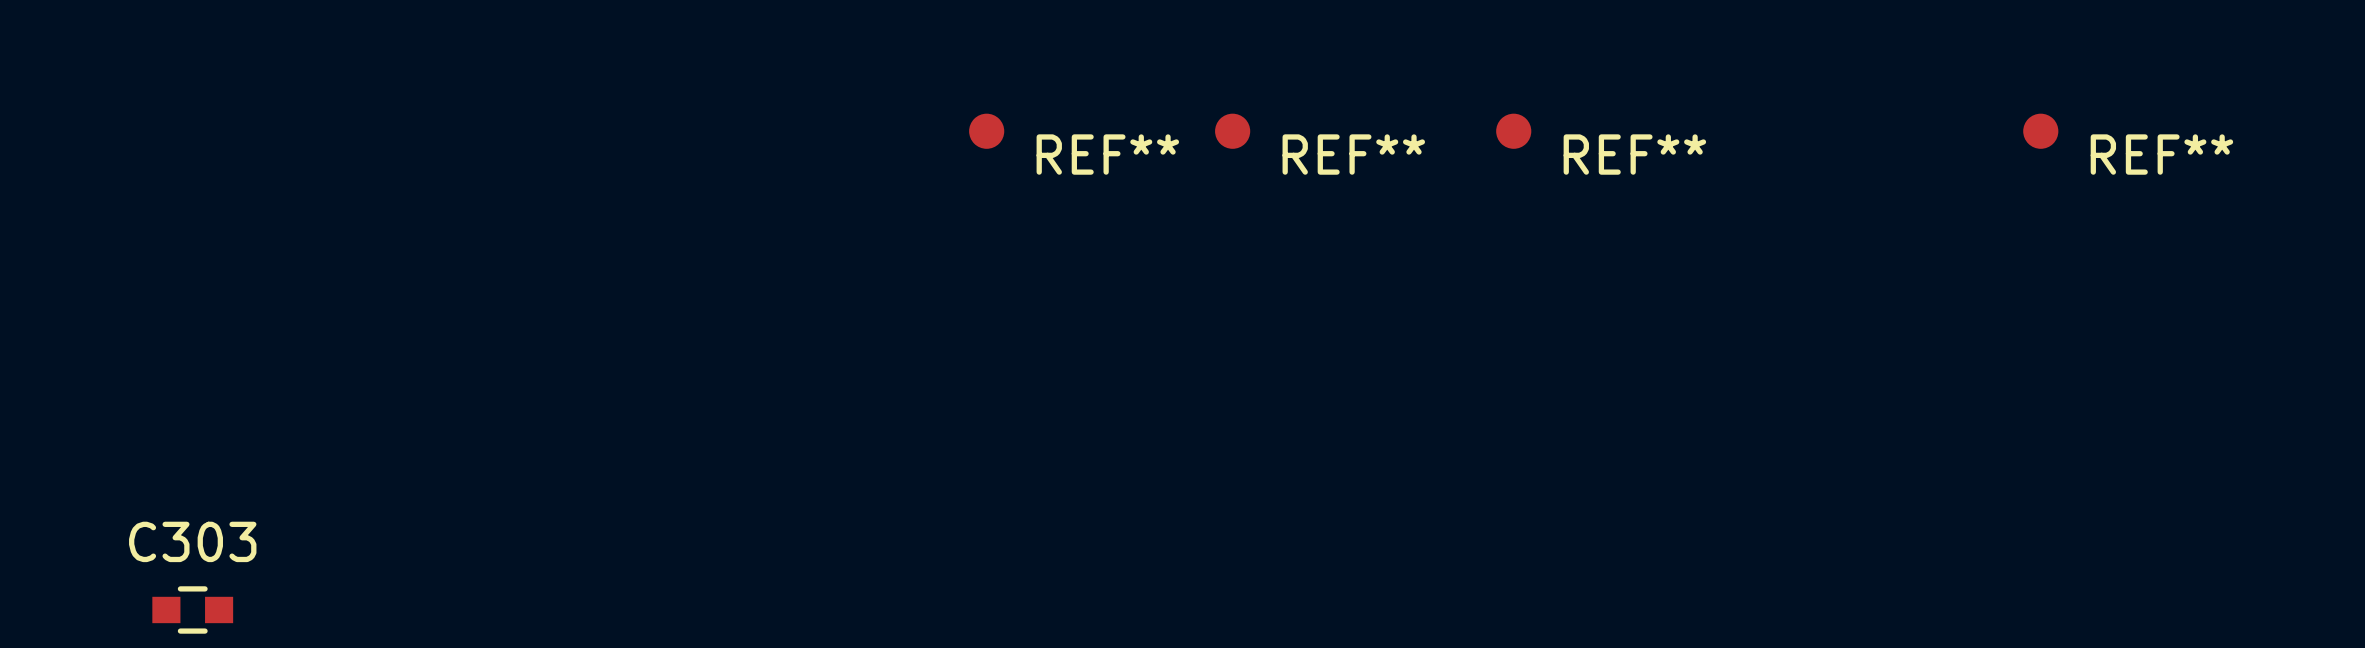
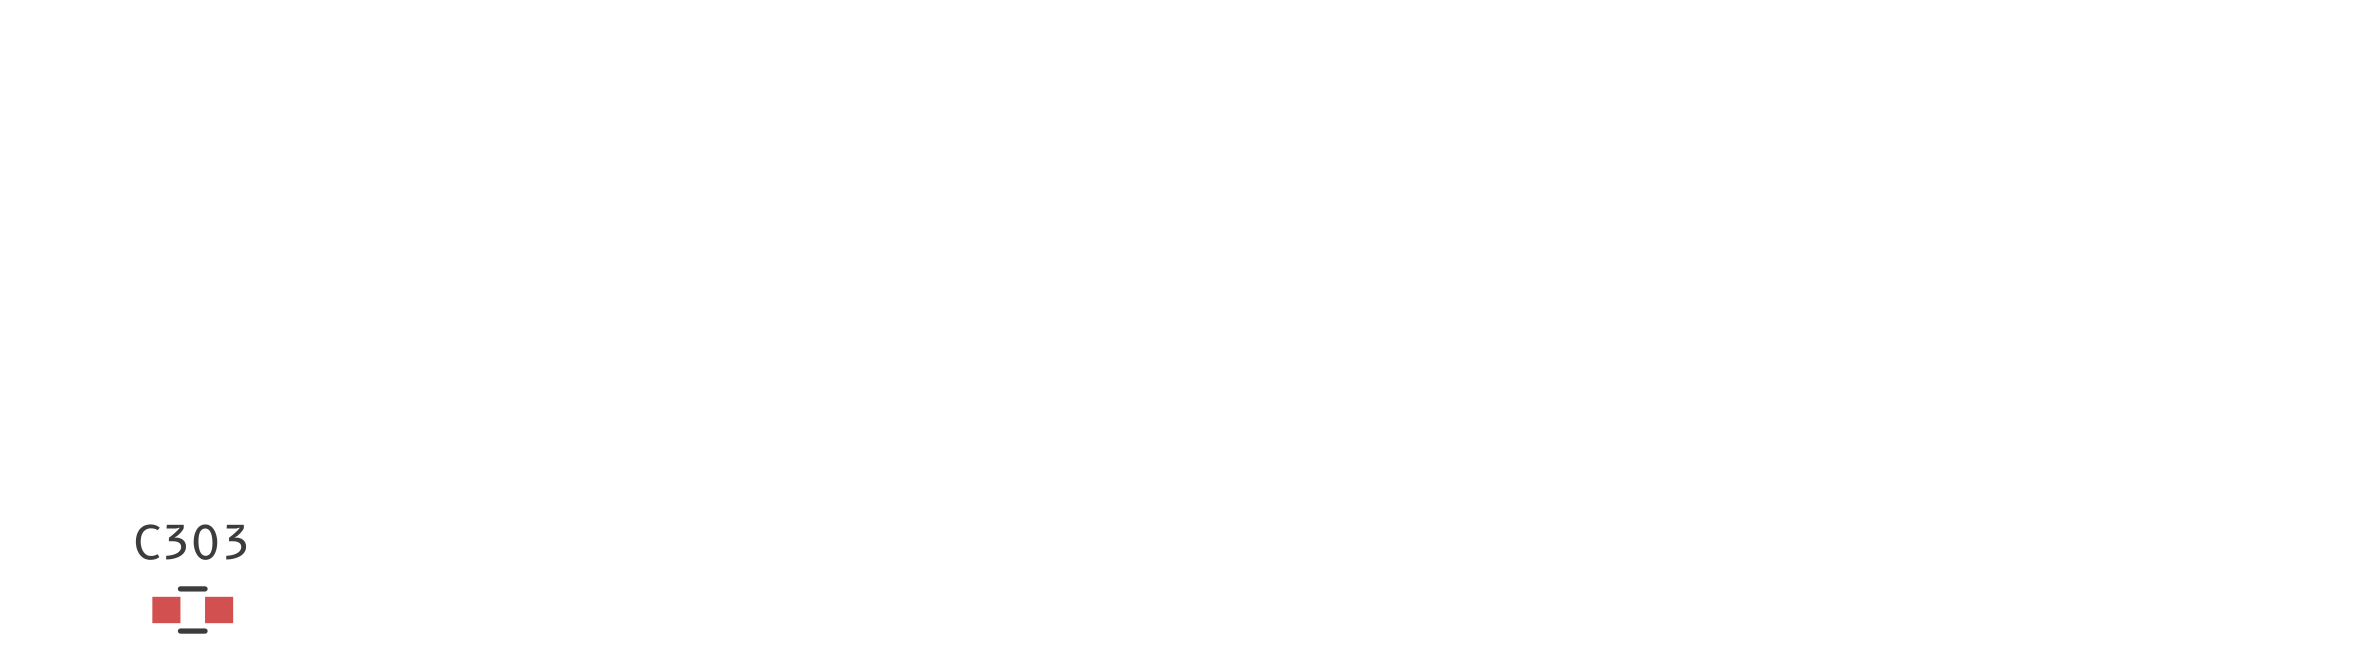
REF**: (986, 131) -> none
REF**: (1232, 131) -> none
REF**: (1513, 131) -> none
REF**: (2040, 131) -> none

